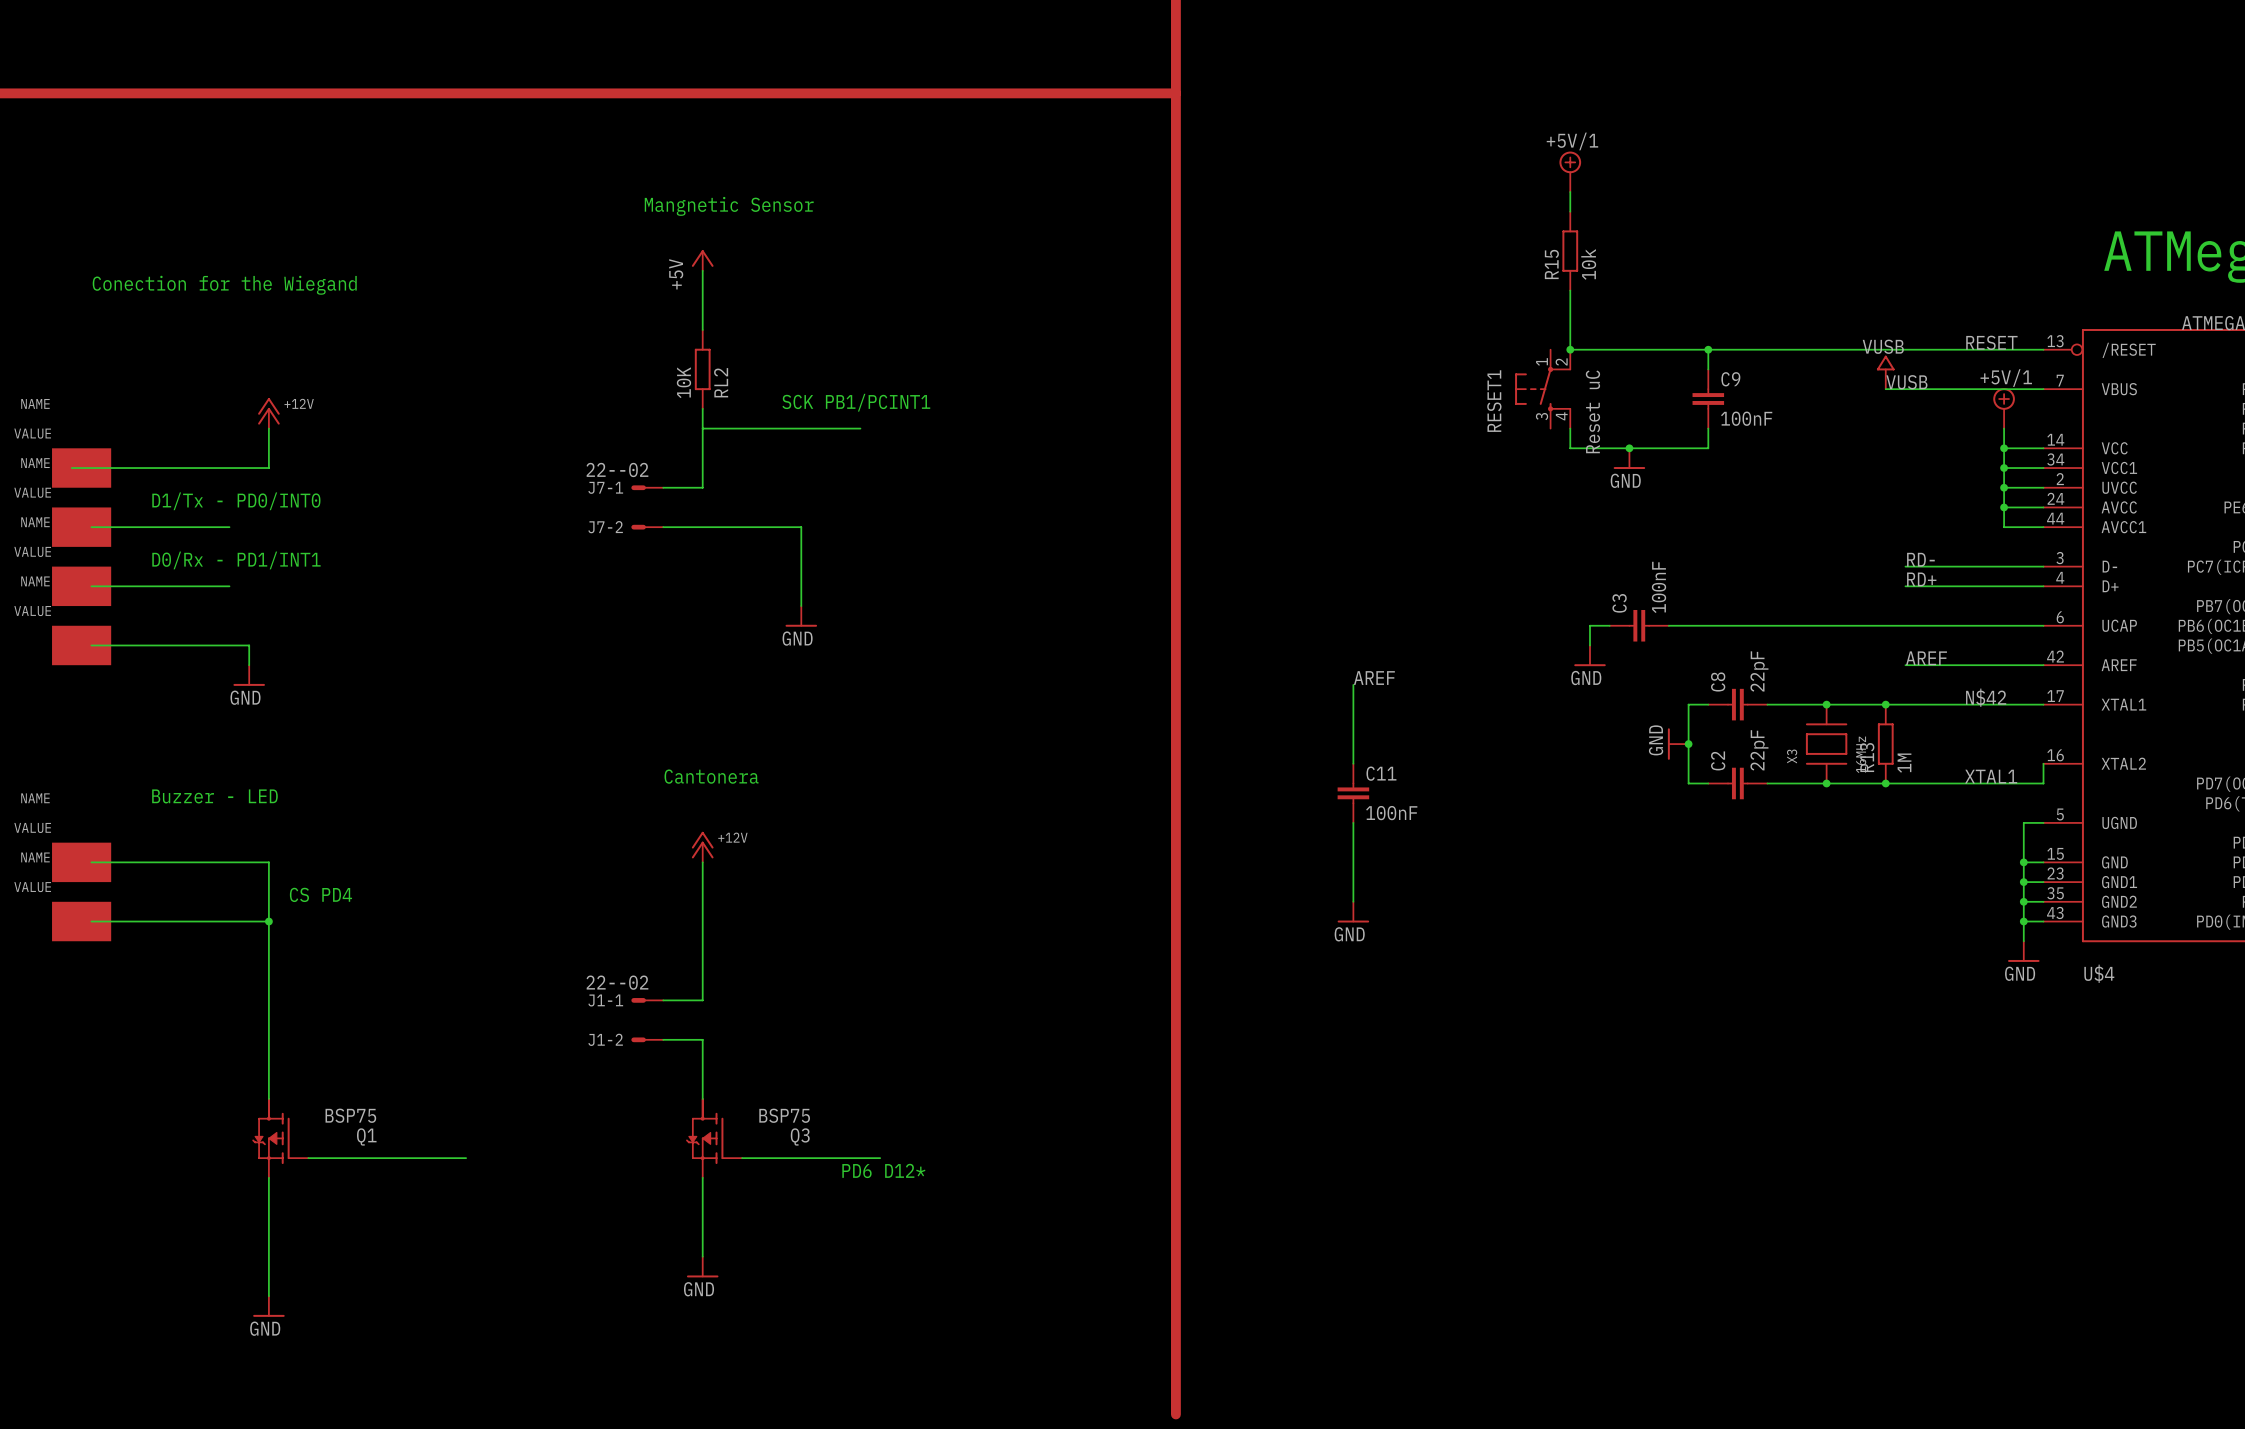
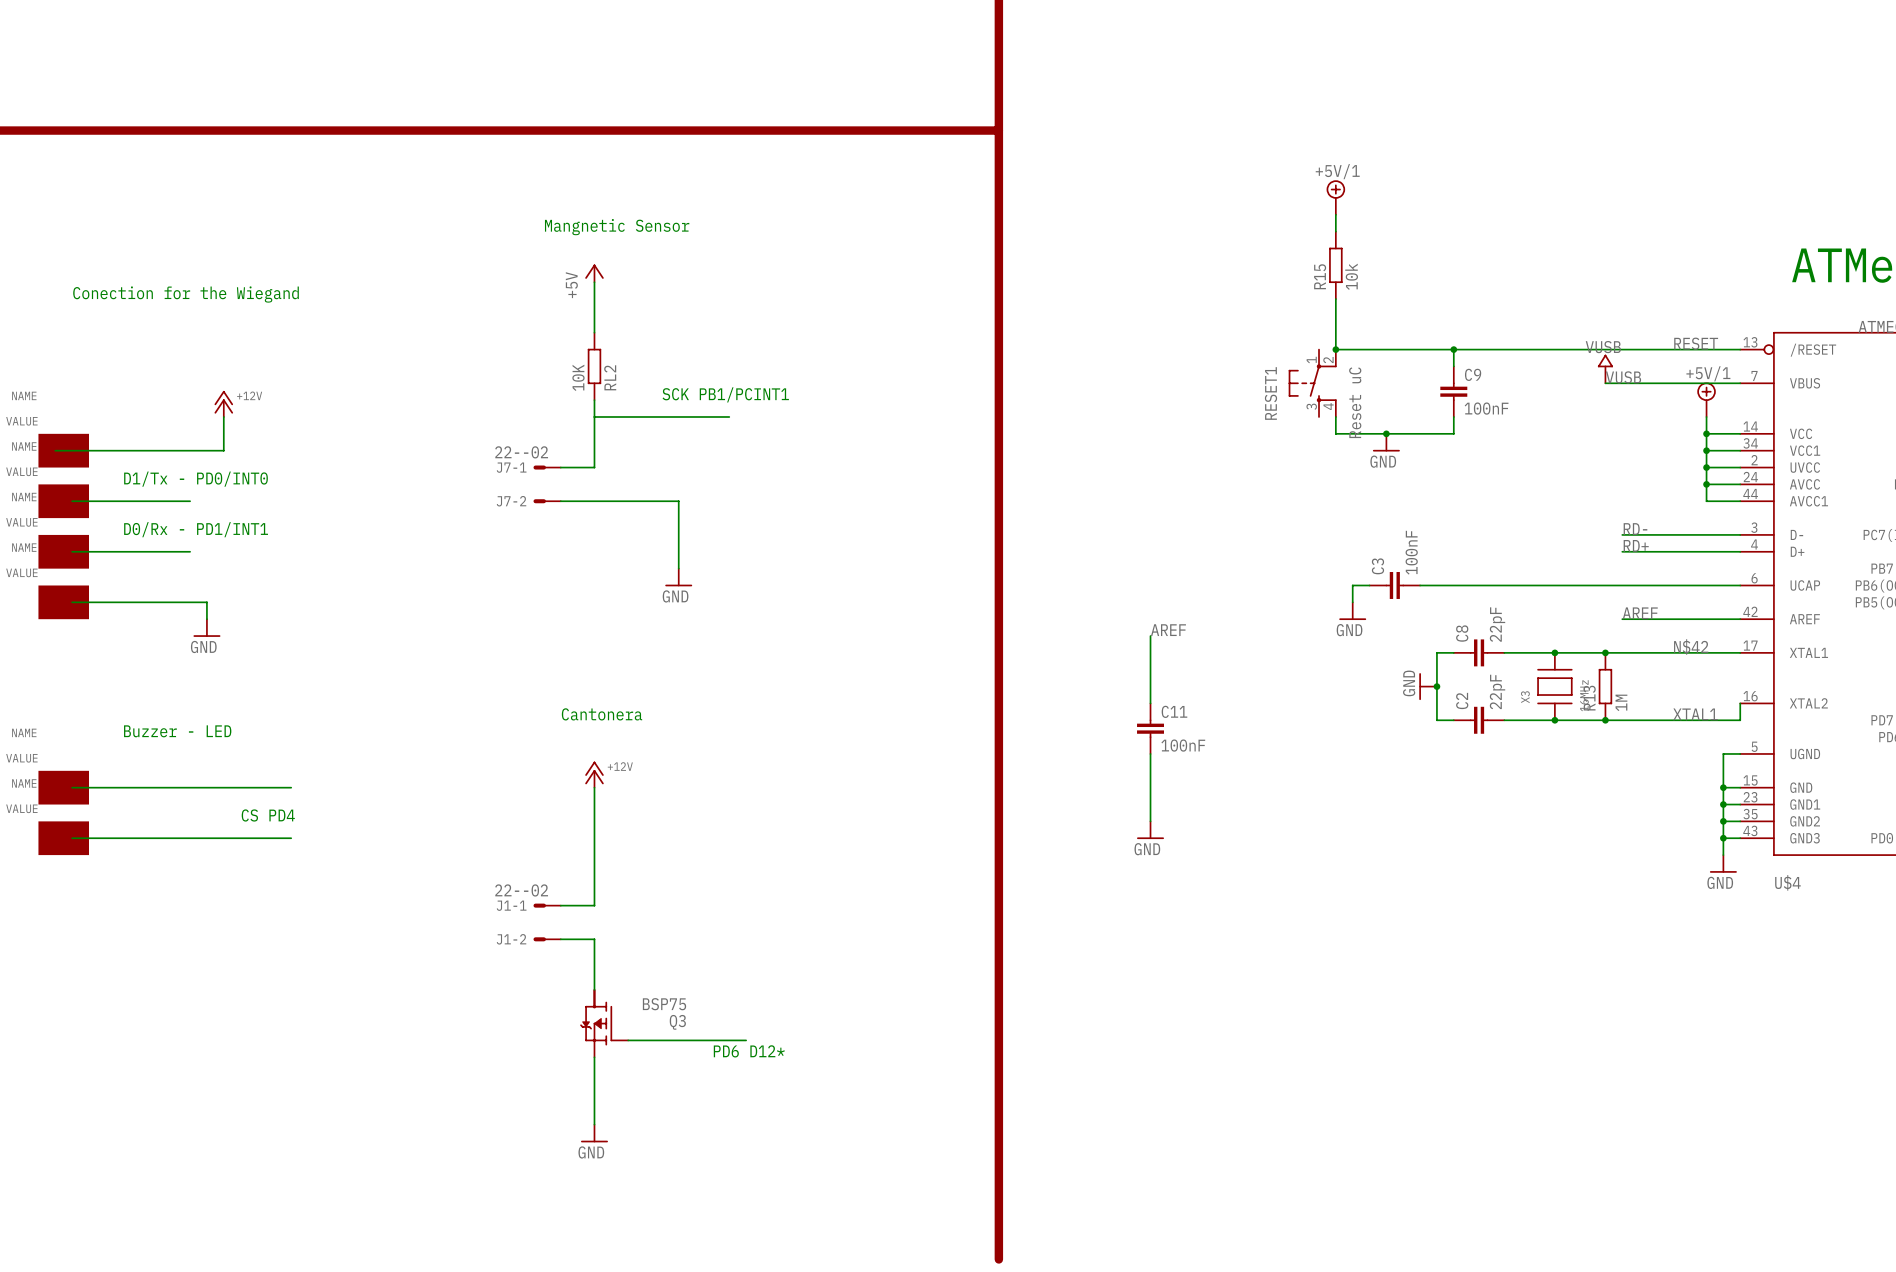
wire: (268, 862) (268, 1098) -> (223, 787) (291, 787)
wire: none -> (223, 838) (291, 838)
junction: (268, 921) -> none
Q1: BSP75 (280, 1138) -> none
wire: (308, 1158) (466, 1158) -> none
wire: (268, 1177) (268, 1296) -> none
power symbol: GND (268, 1306) -> none

